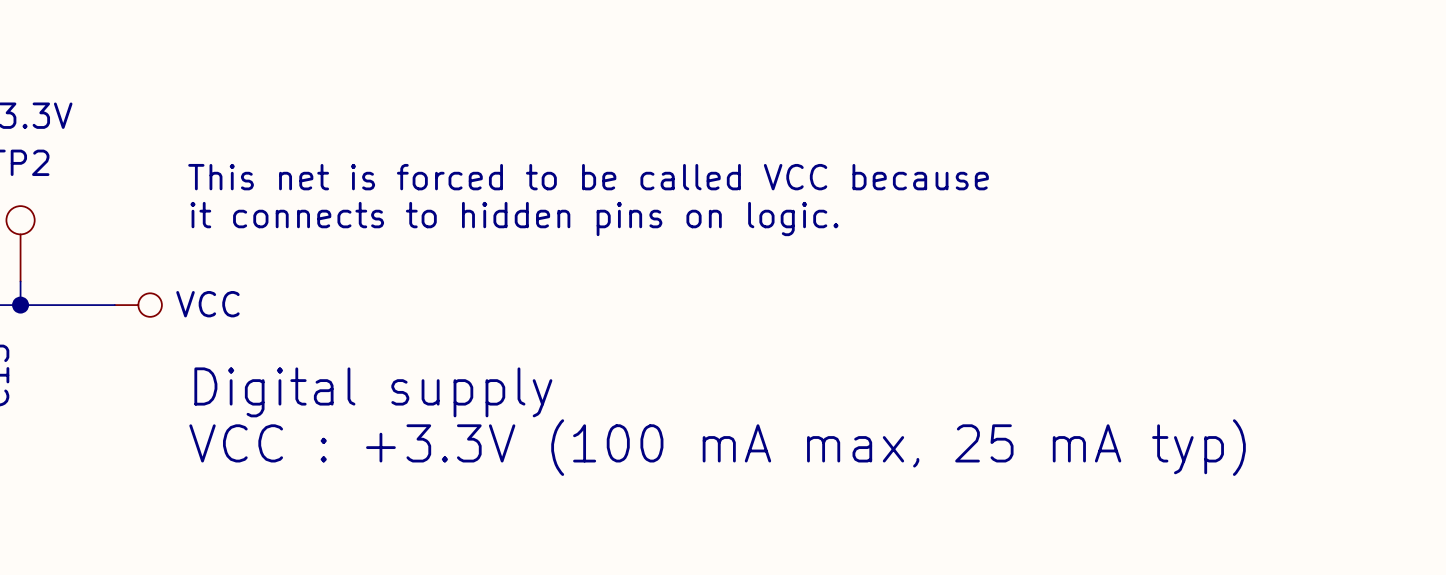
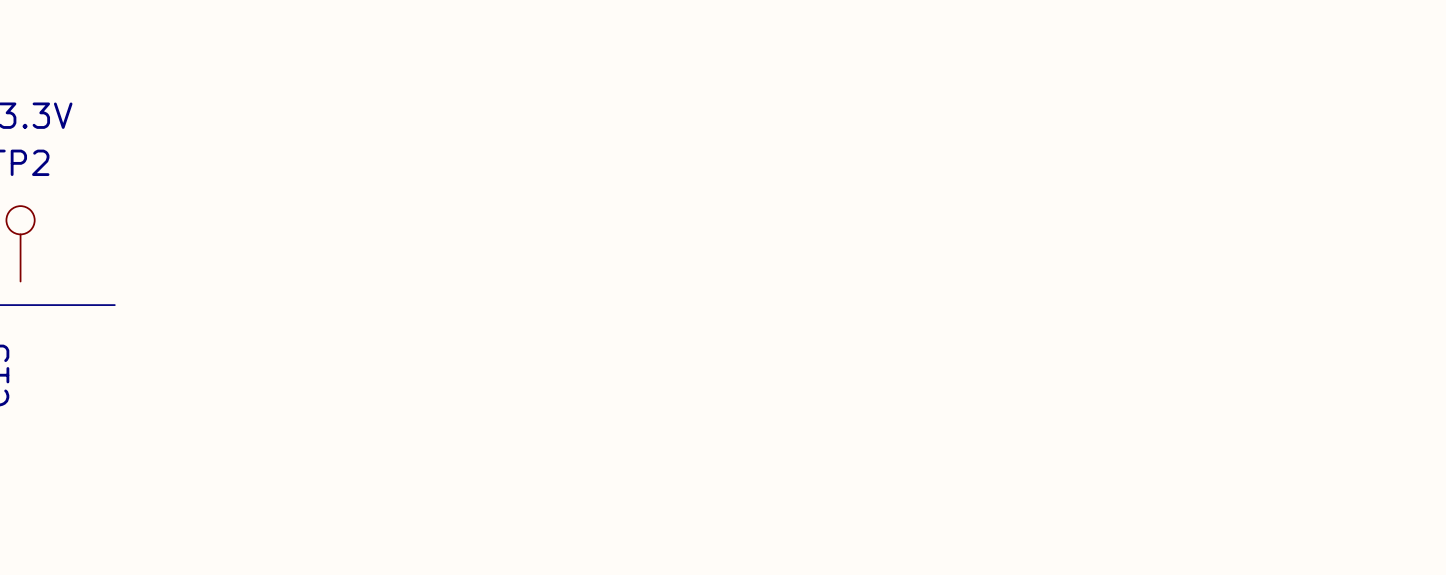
text: This net is forced to be called VCC because (588, 177) -> none
text: it connects to hidden pins on logic. (514, 219) -> none
wire: (20, 281) (20, 305) -> none
junction: (20, 305) -> none
power symbol: VCC (138, 305) -> none
text: Digital supply (373, 392) -> none
text: VCC : +3.3V (100 mA max, 25 mA typ) (717, 447) -> none

